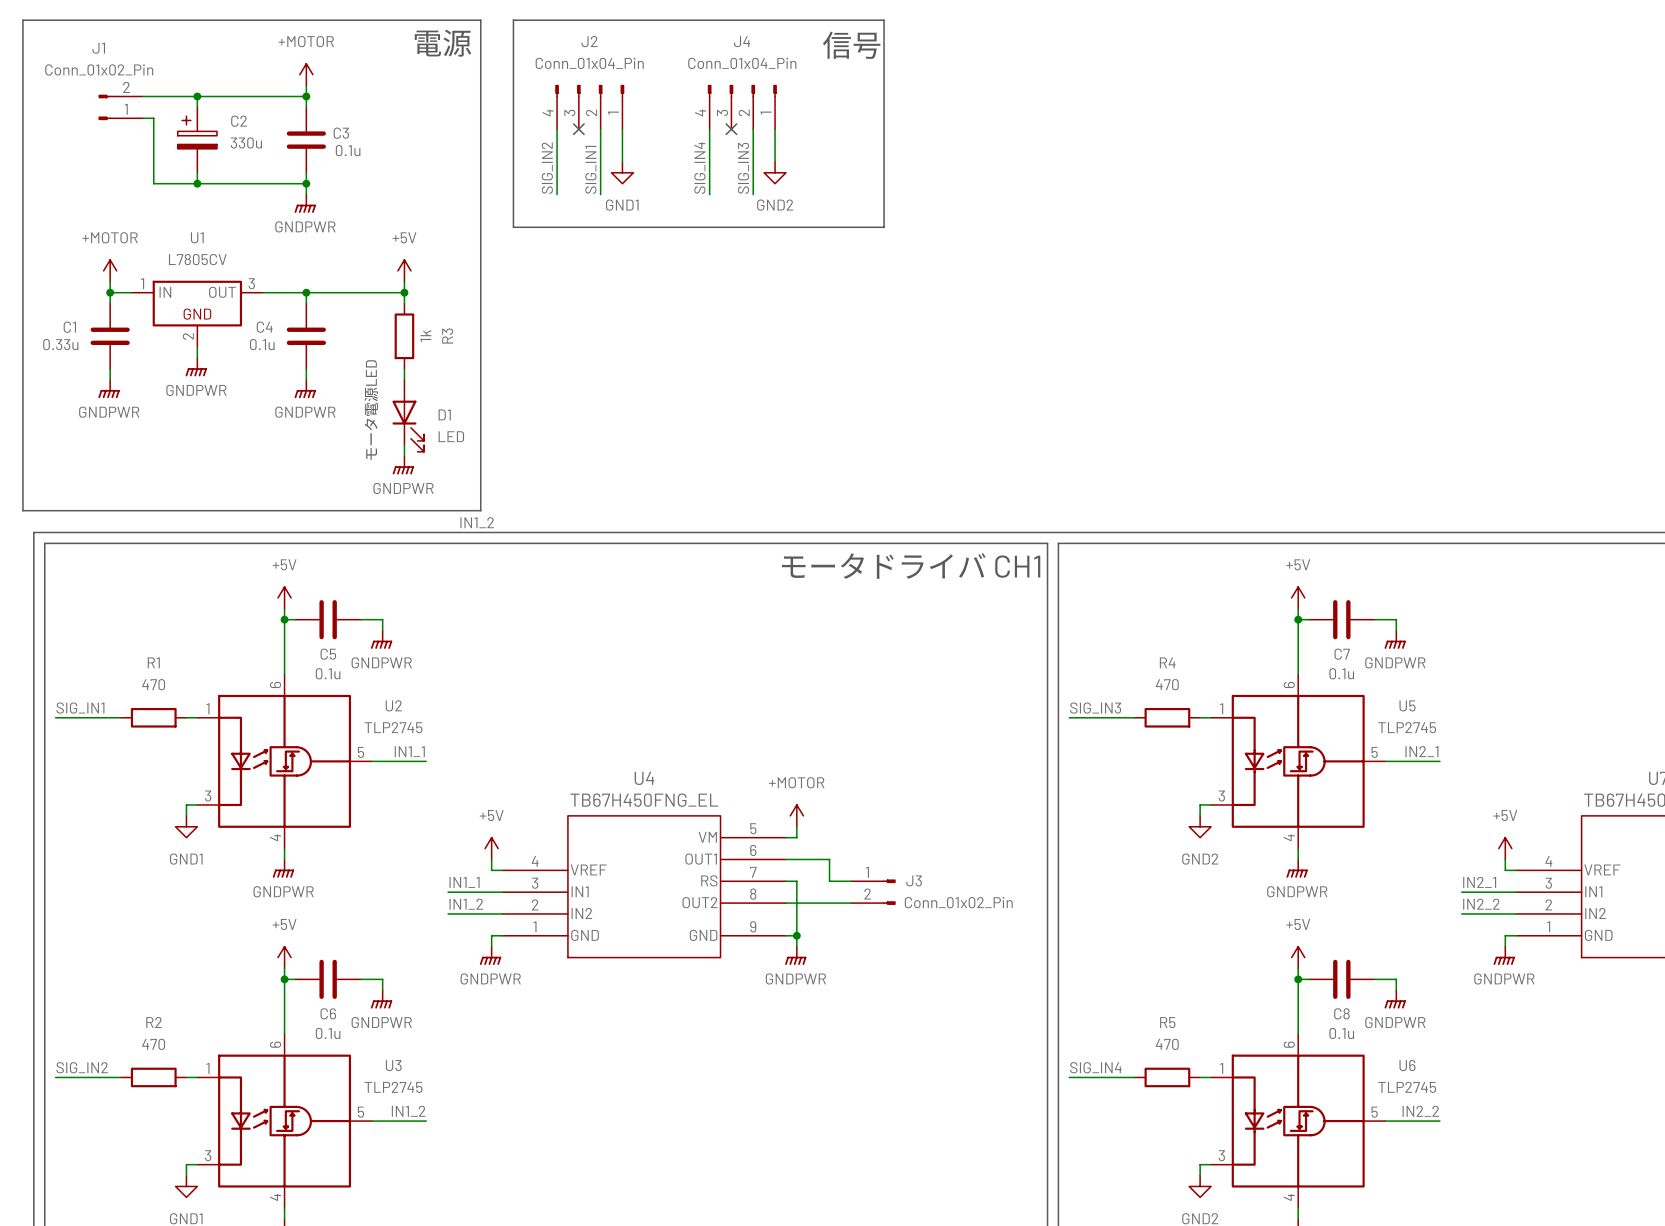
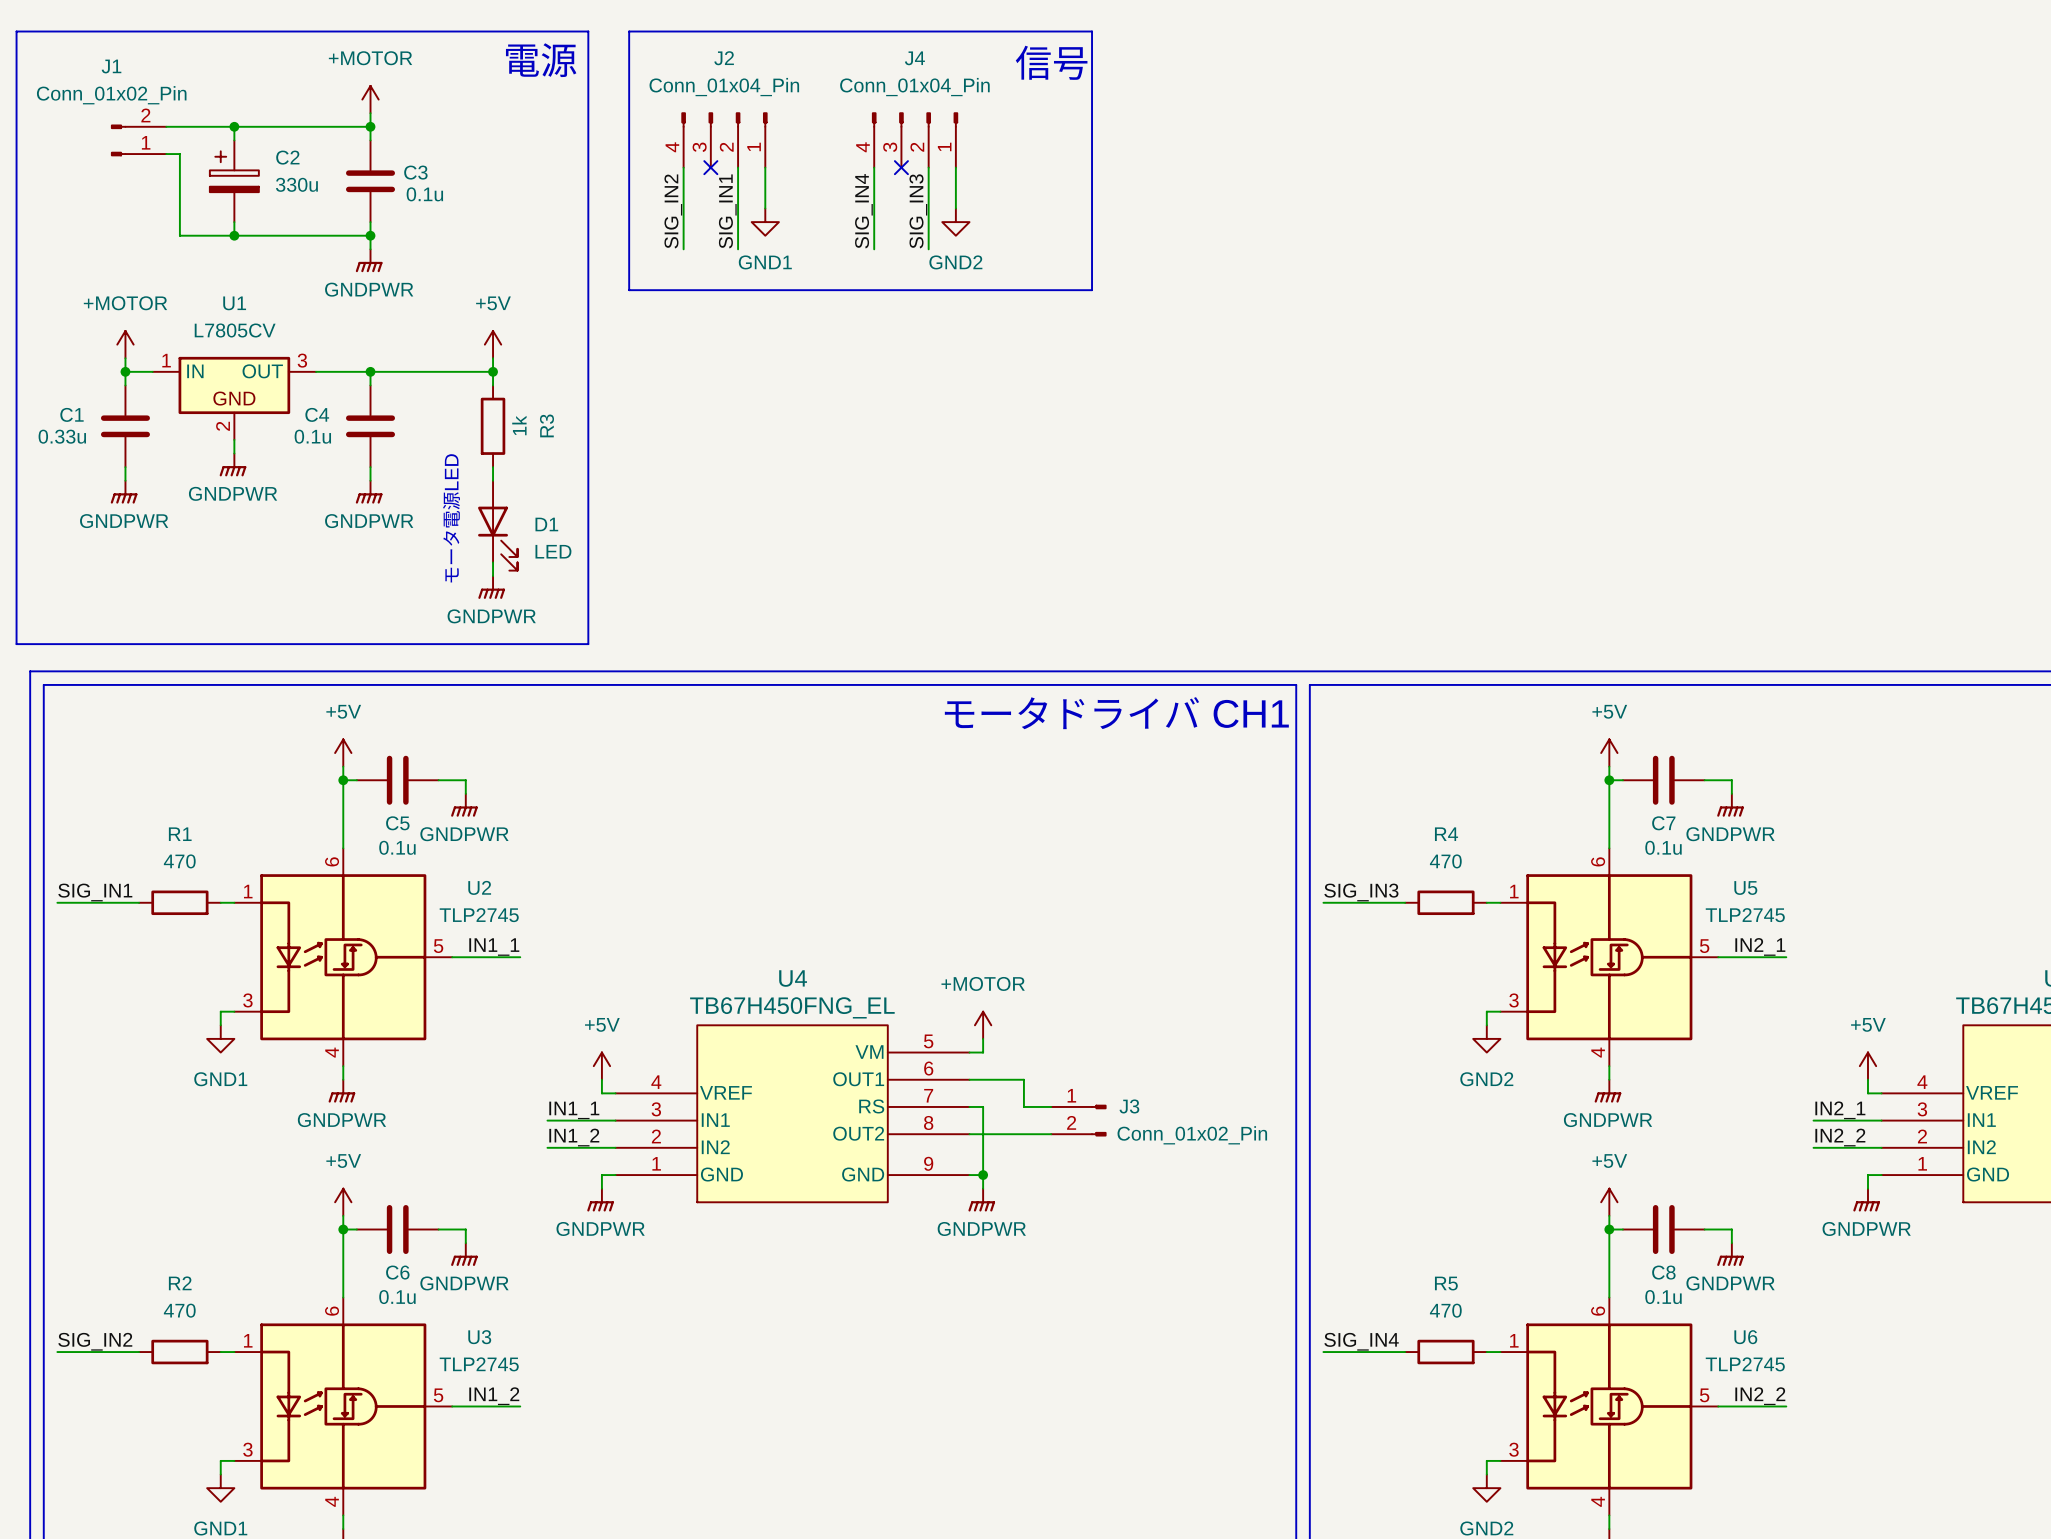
label: IN1_2 (477, 522) -> none

